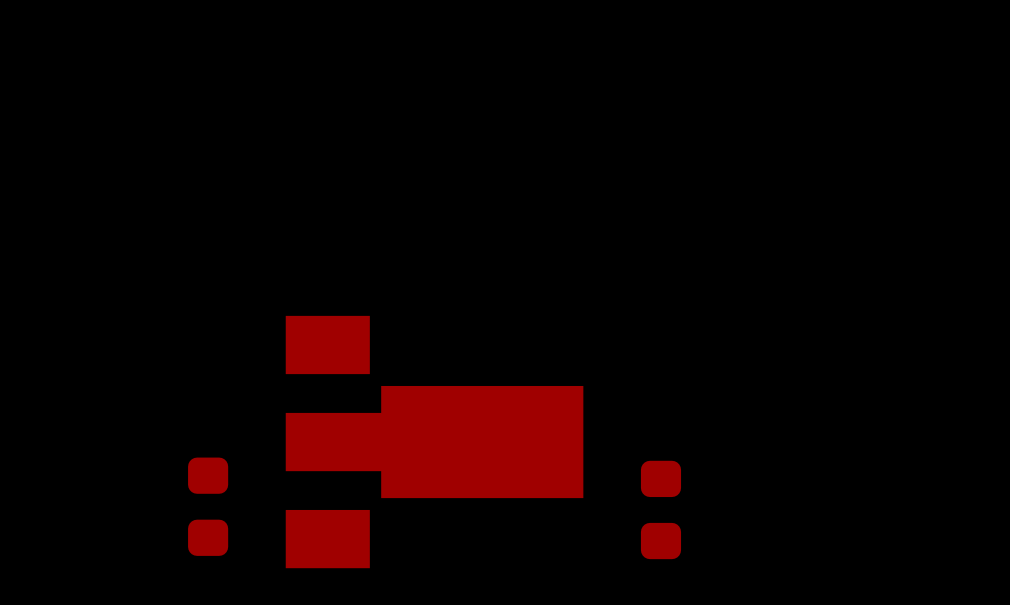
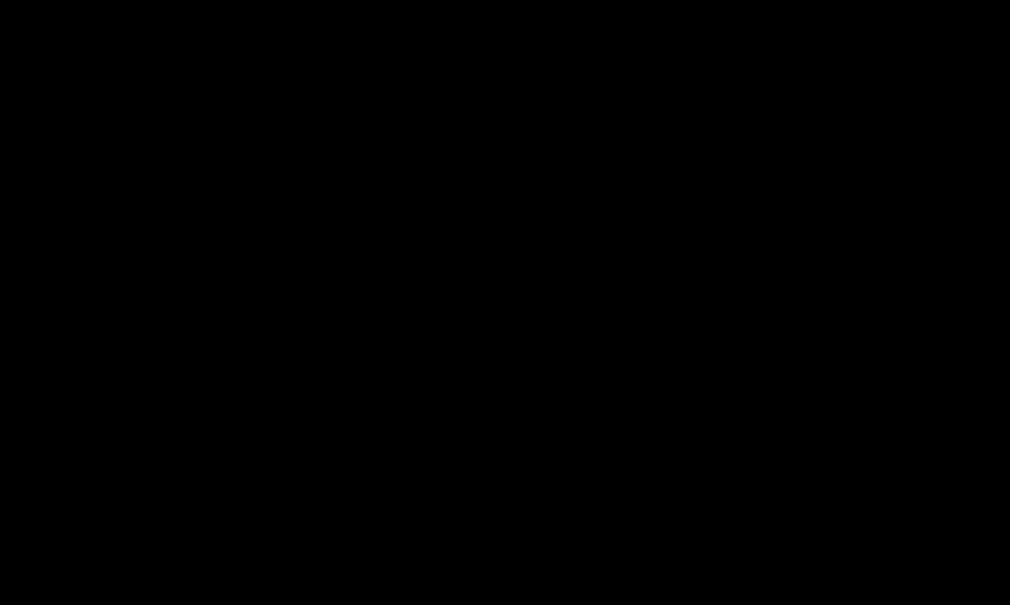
part: (434, 442) -> none
part: (208, 506) -> none
part: (660, 509) -> none

